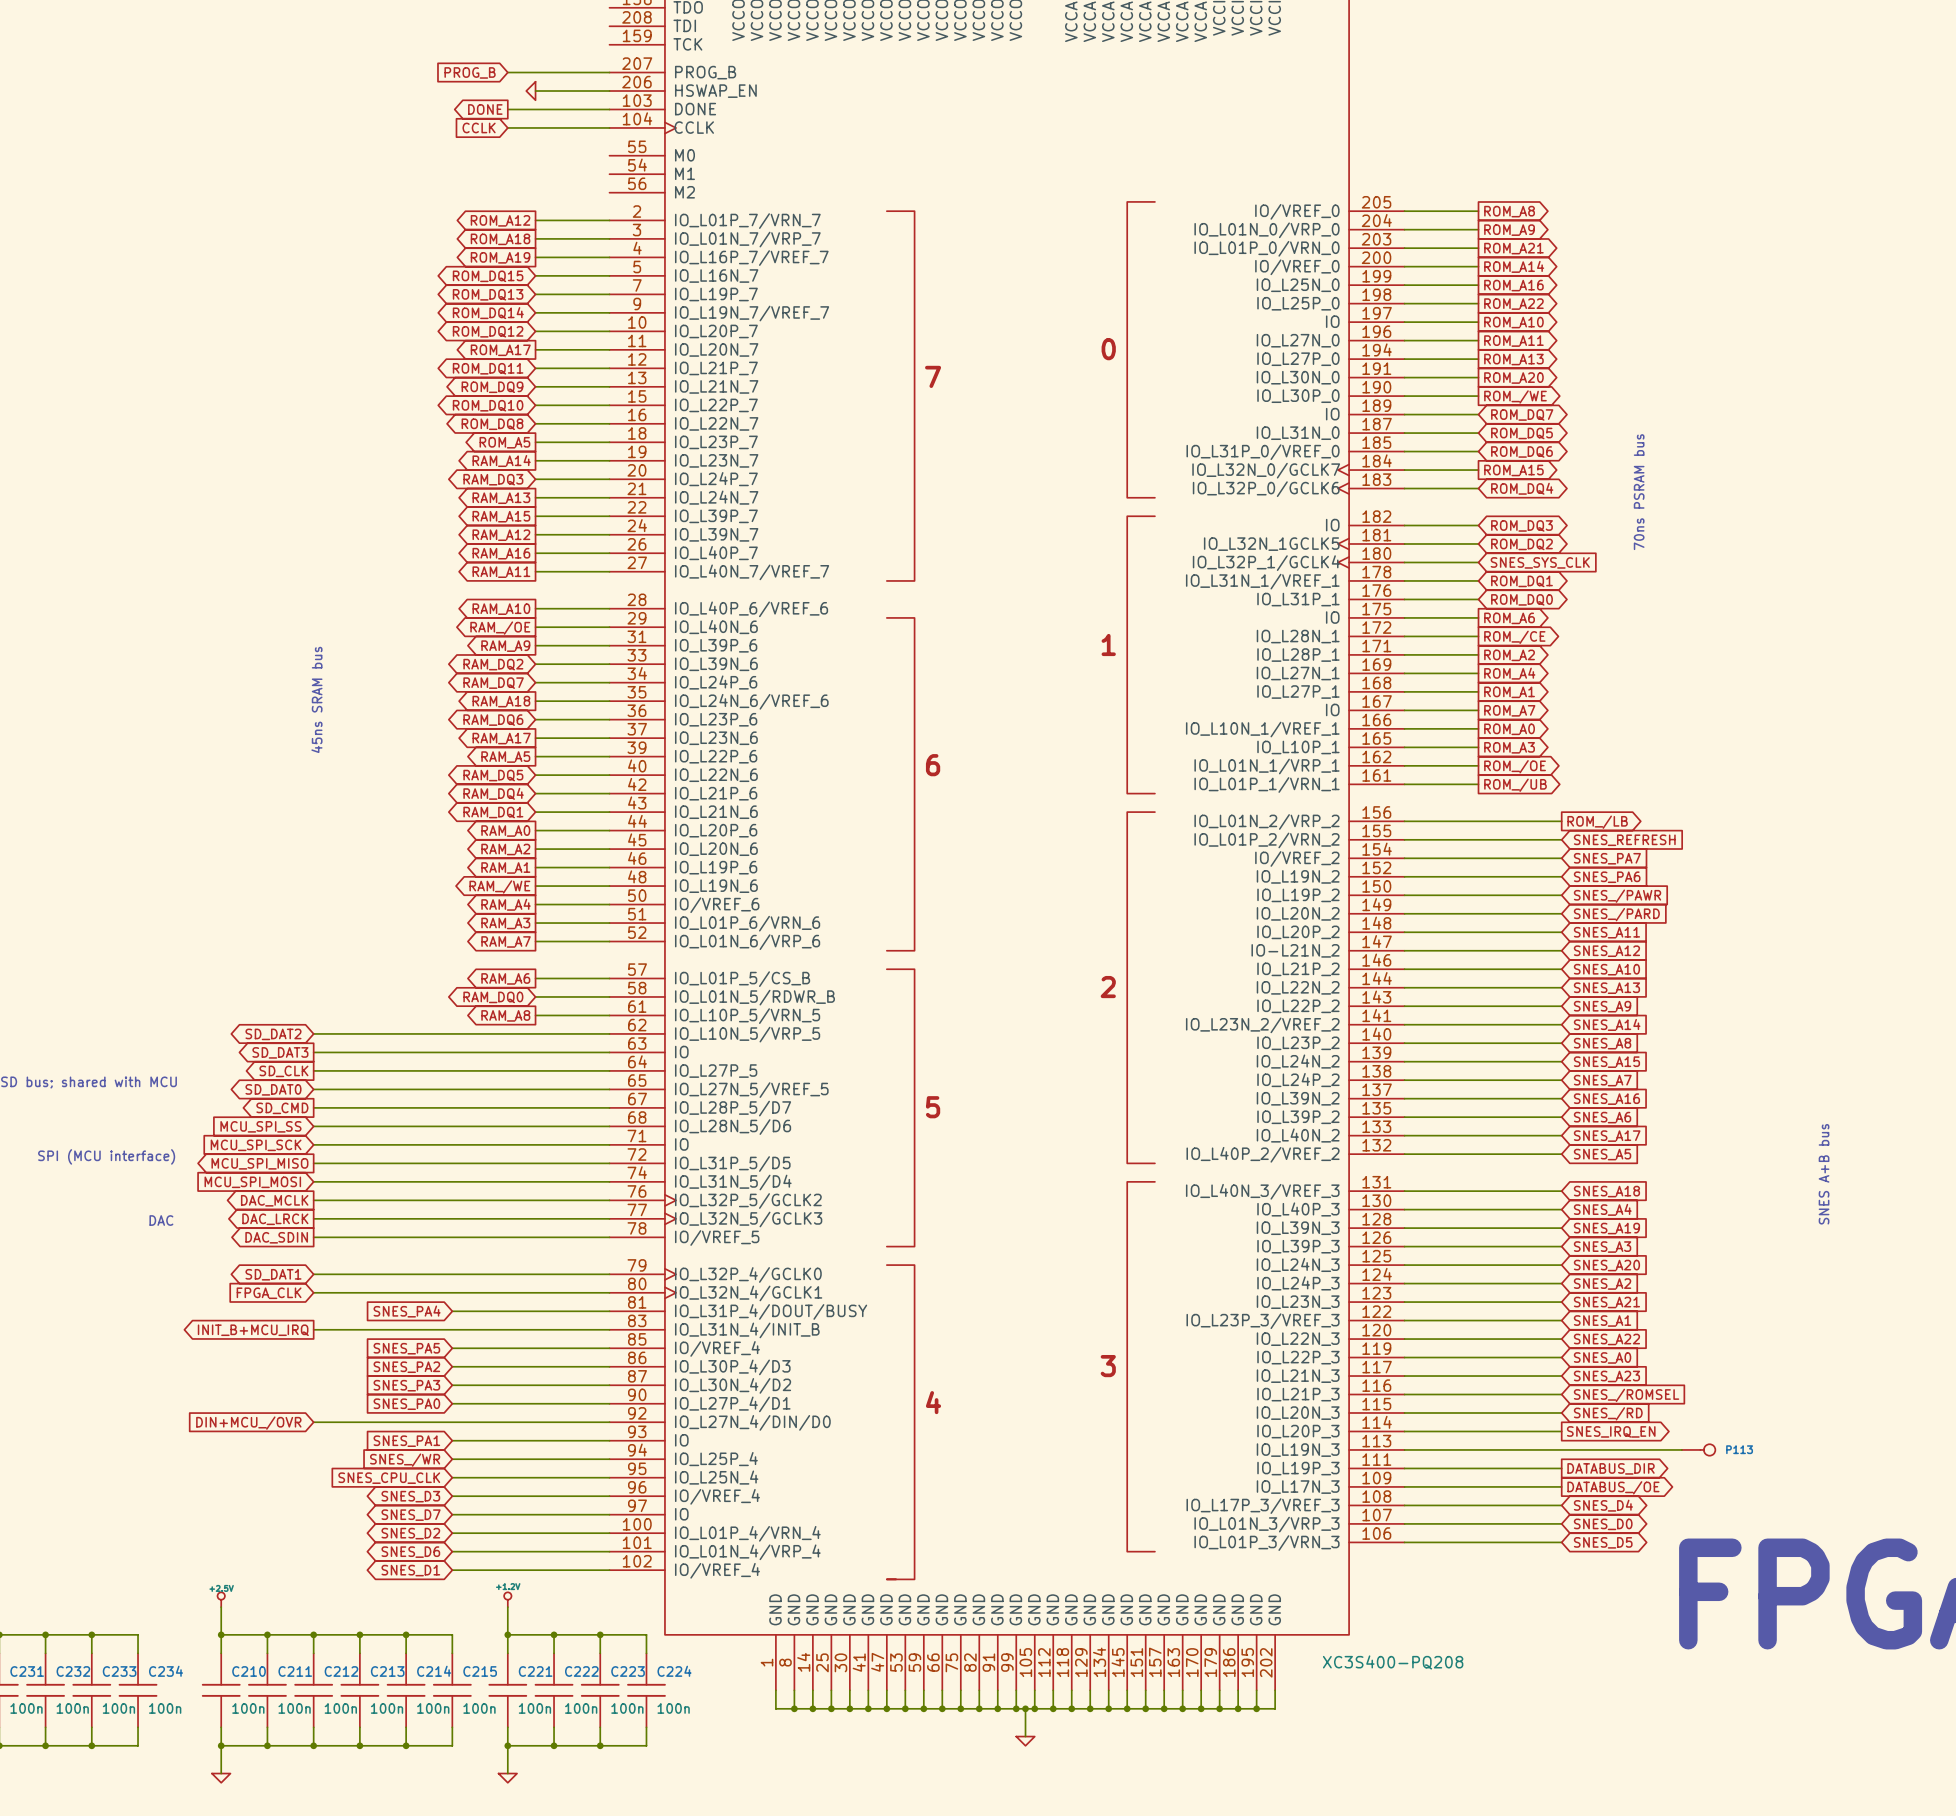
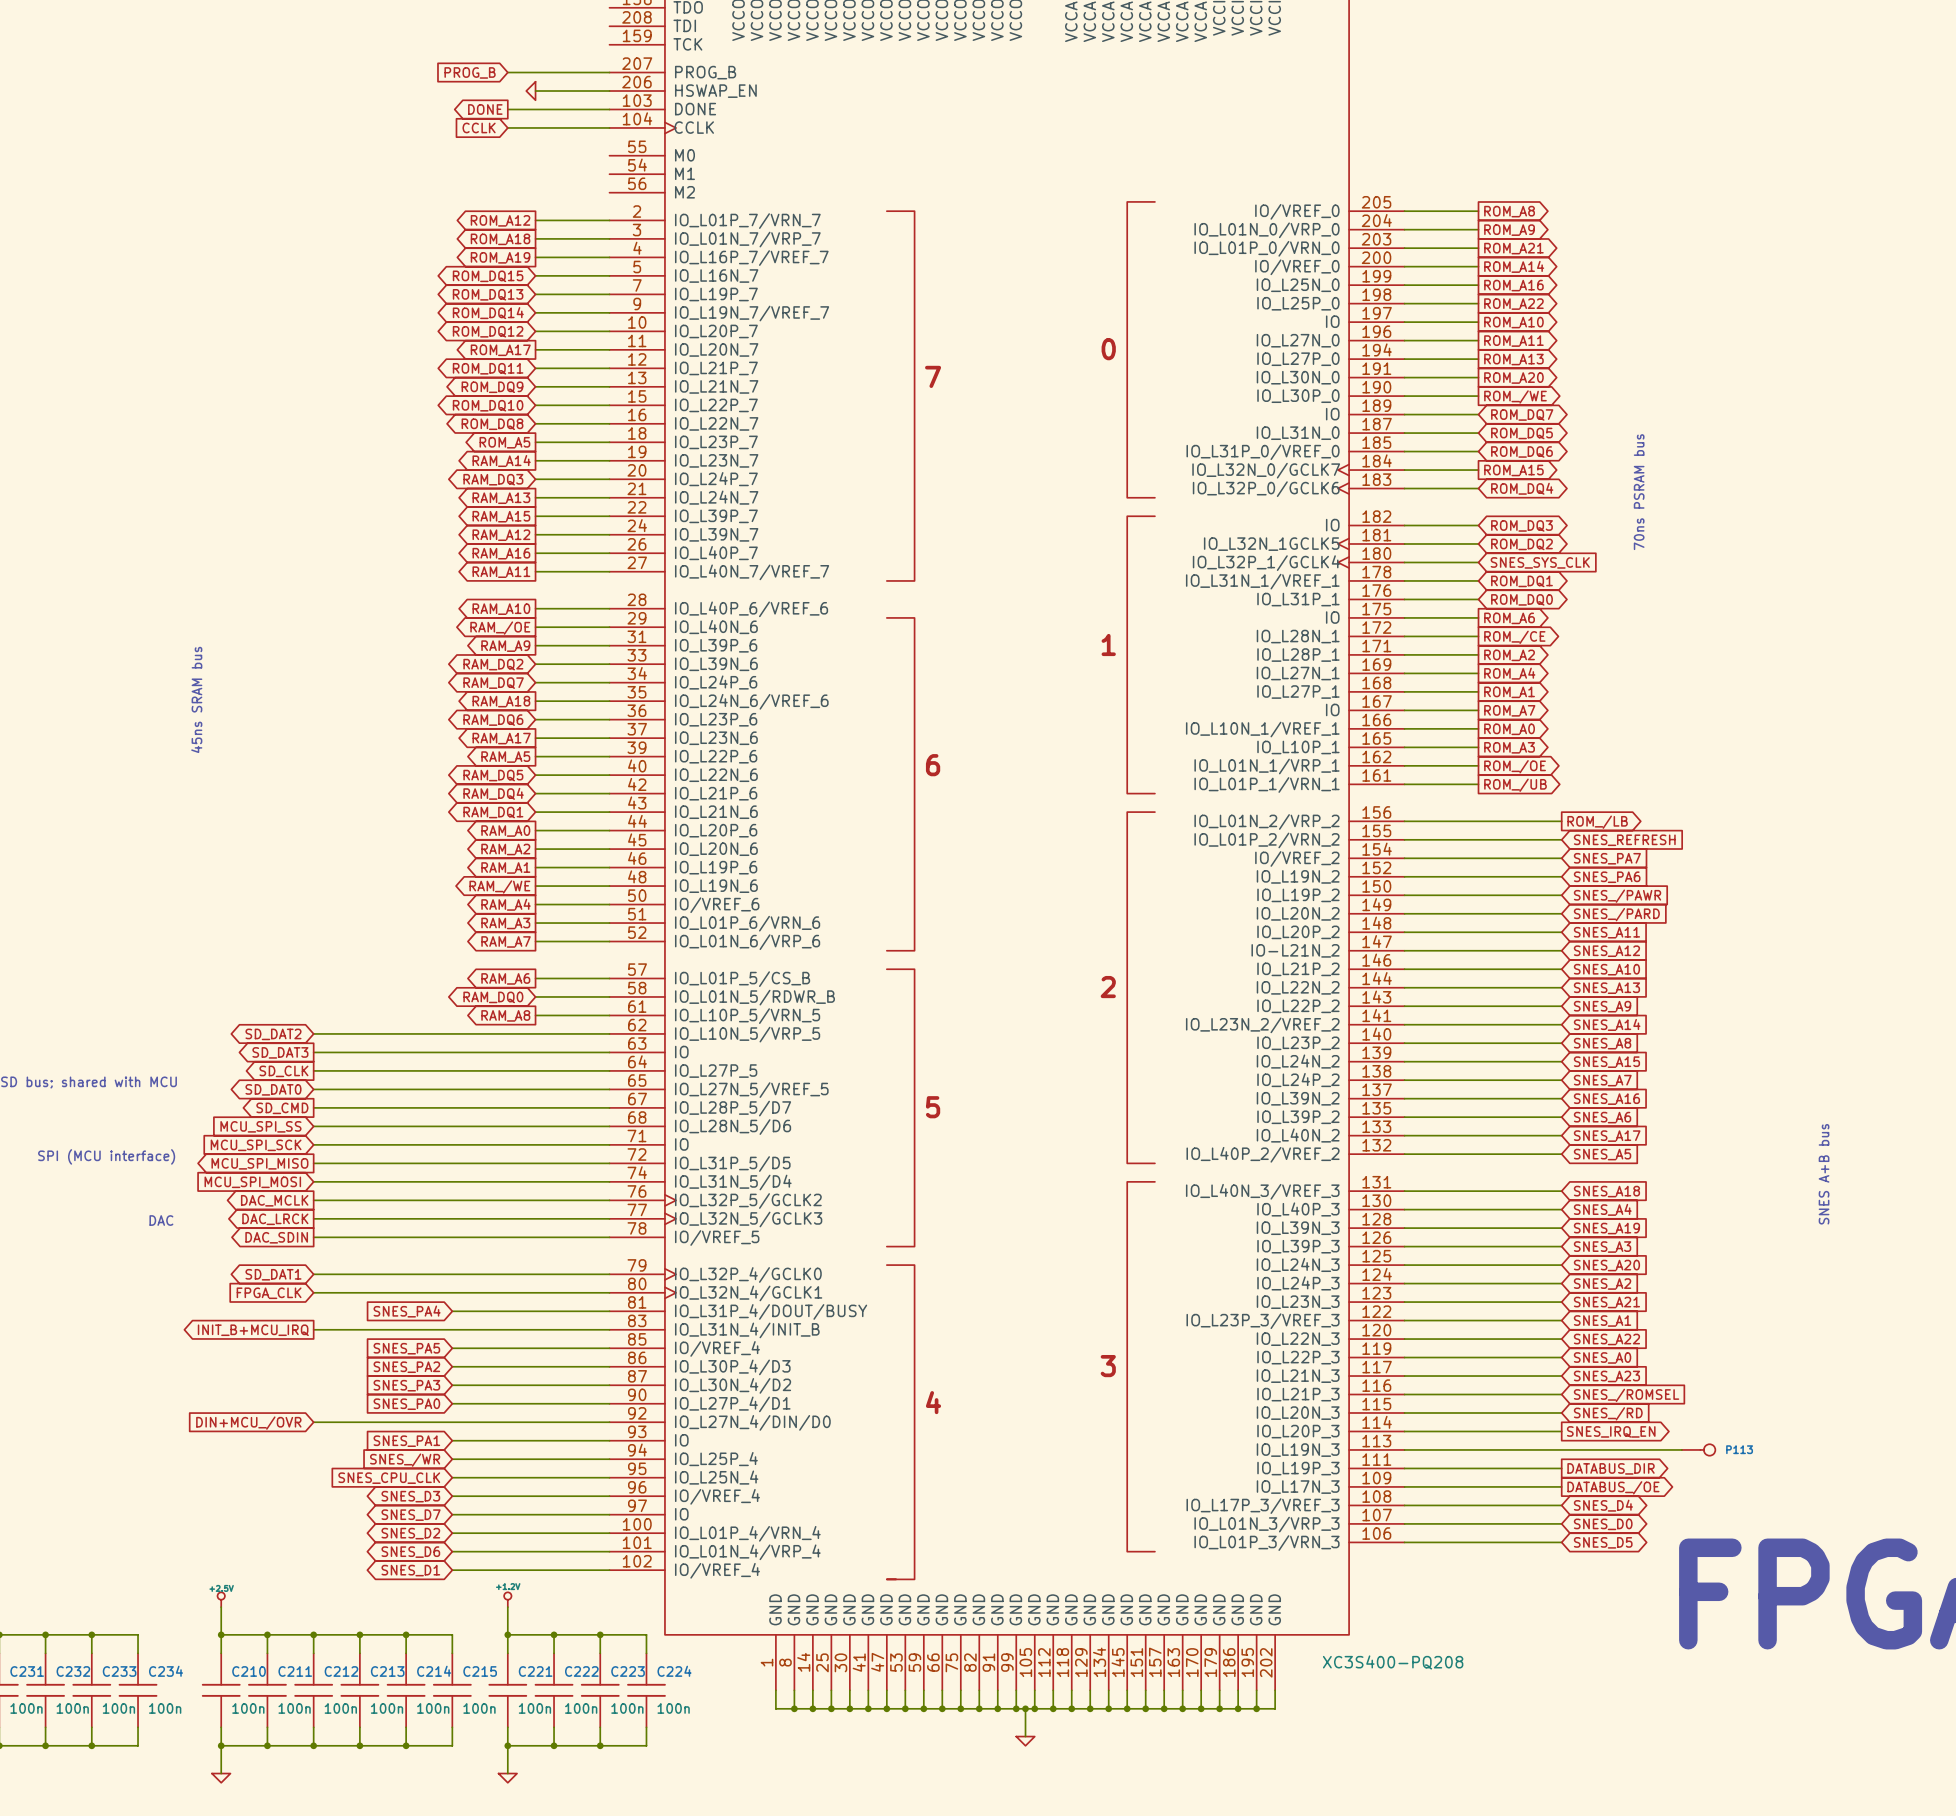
text position: 45ns SRAM bus (316, 699) -> 45ns SRAM bus (196, 699)

